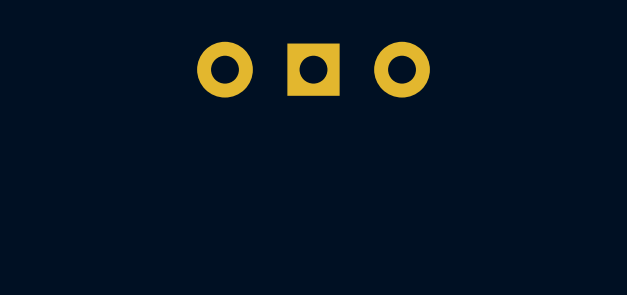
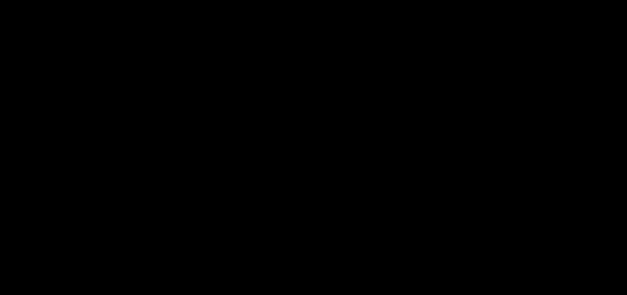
part: (313, 69) -> none

